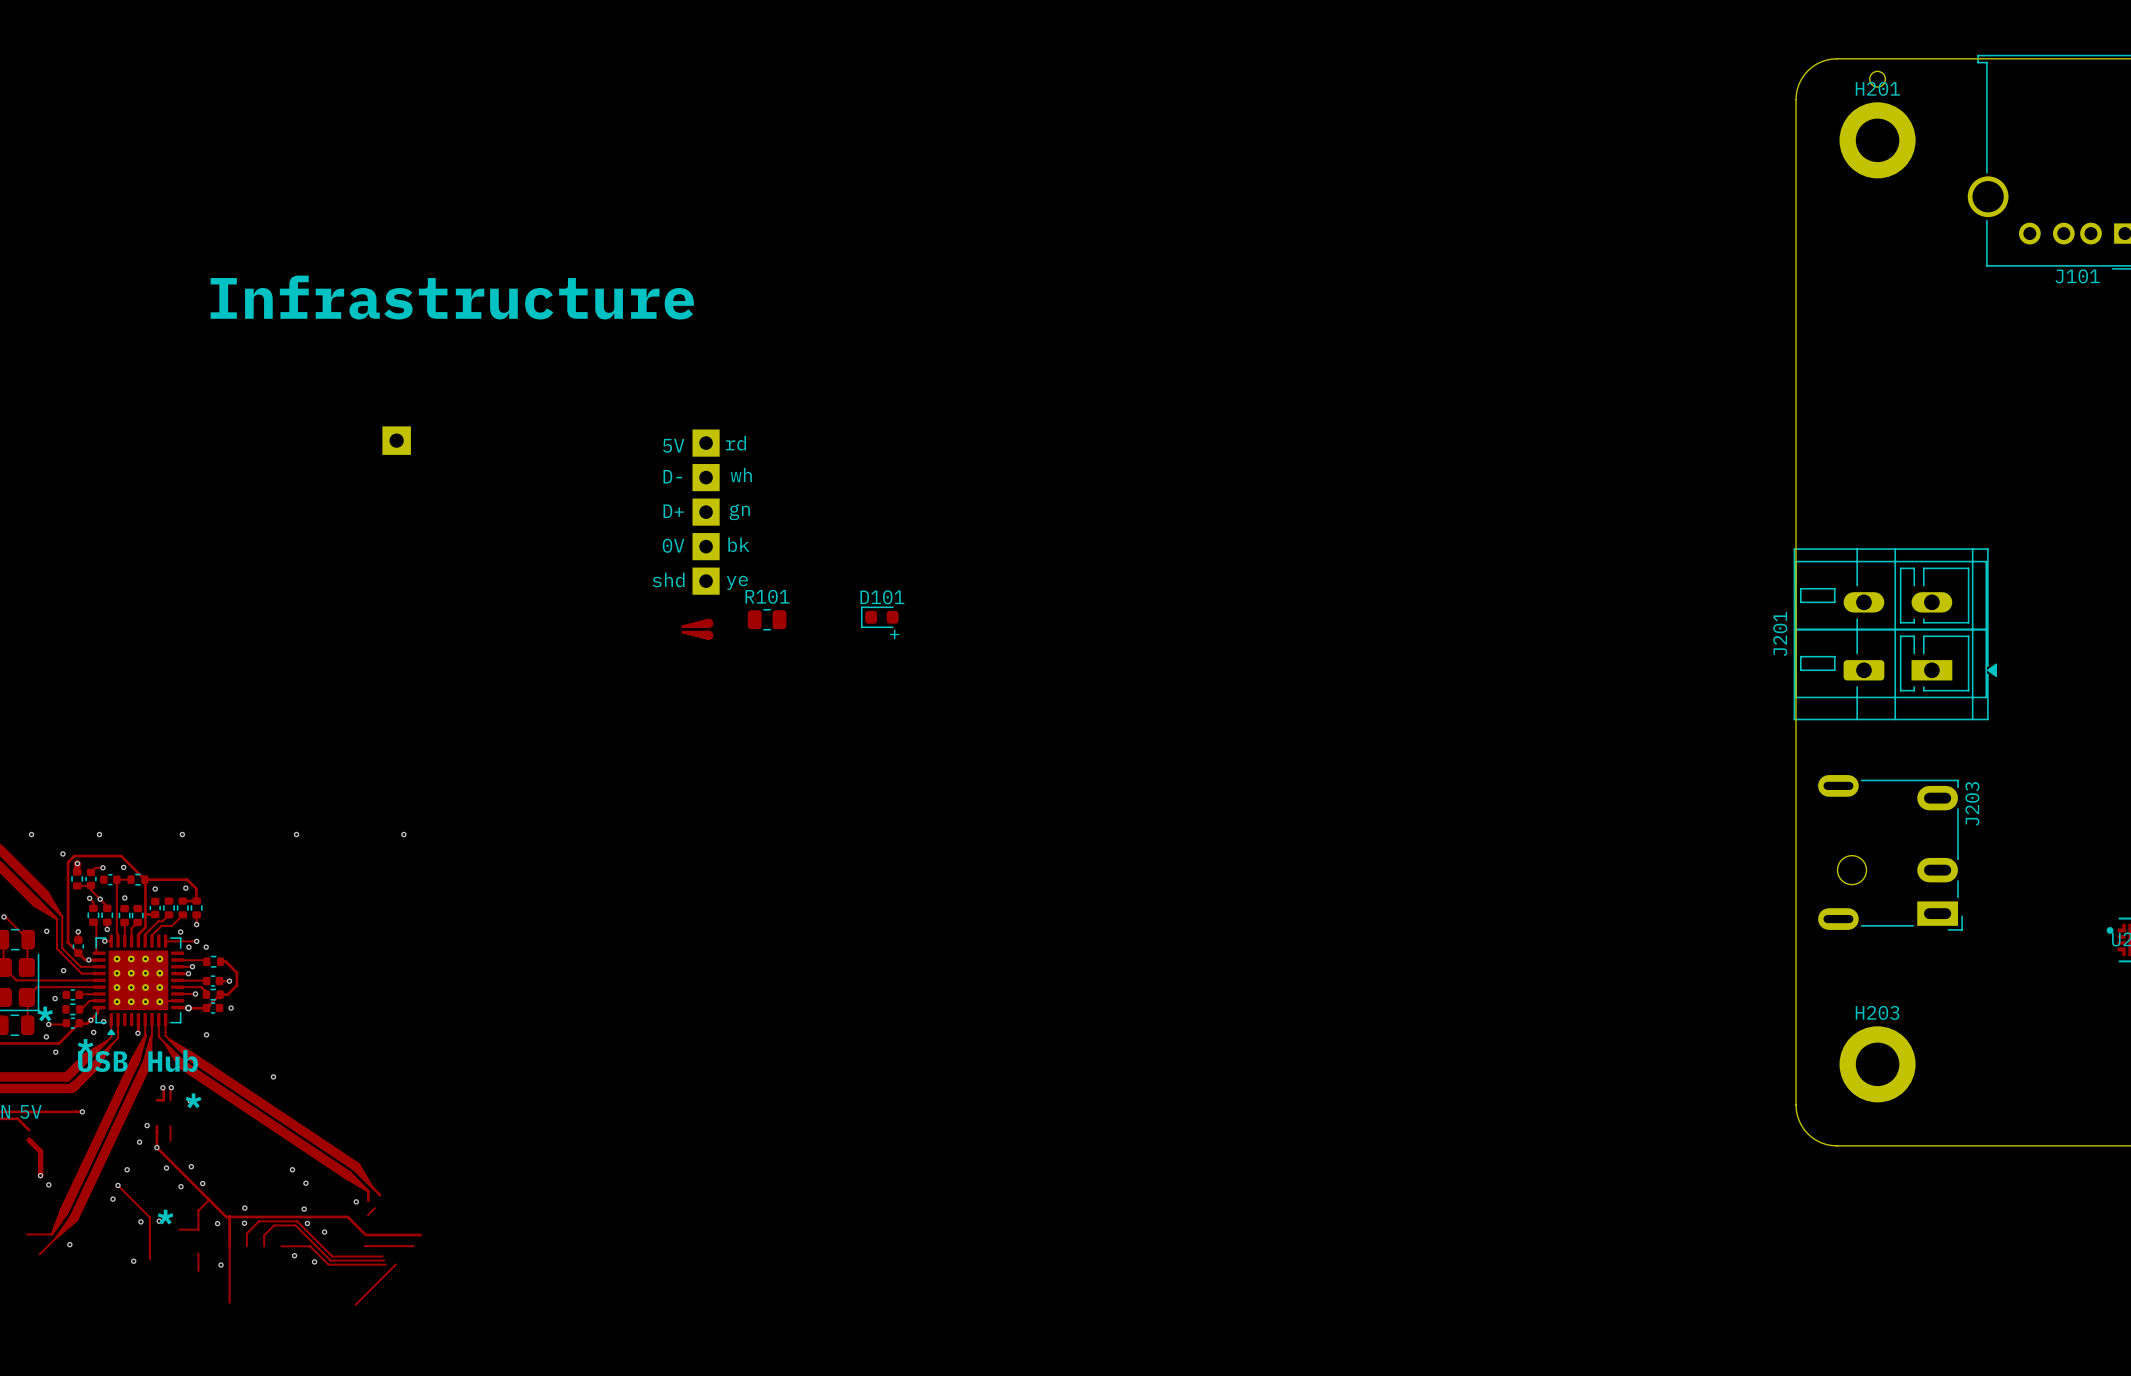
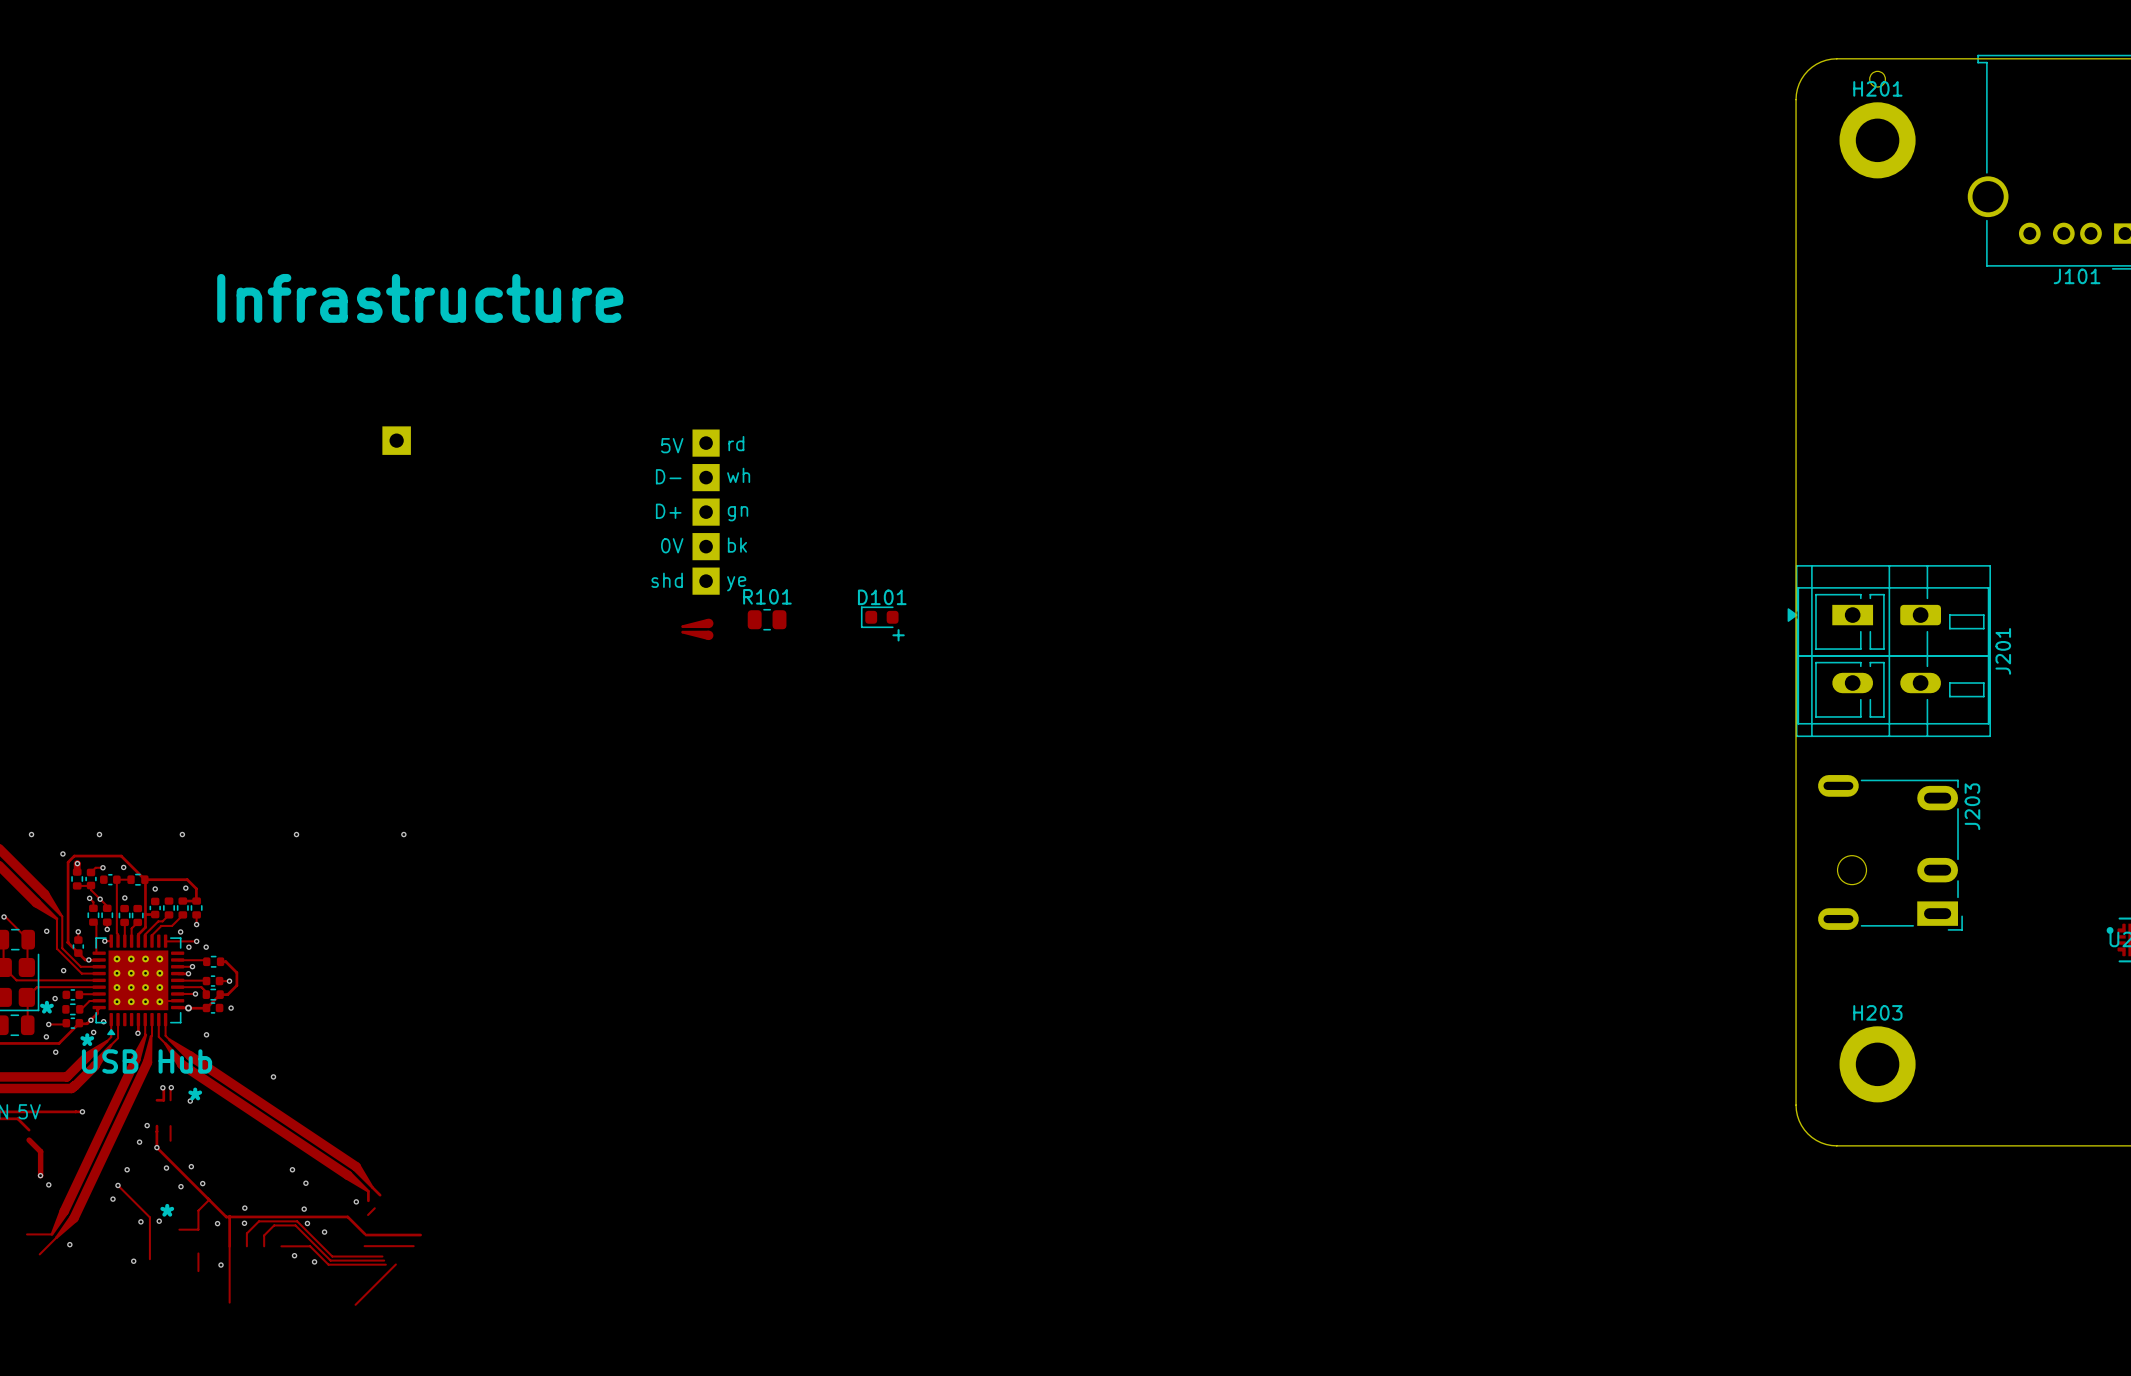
J201 rotation: 0° (1895, 634) -> 180° (1889, 651)

